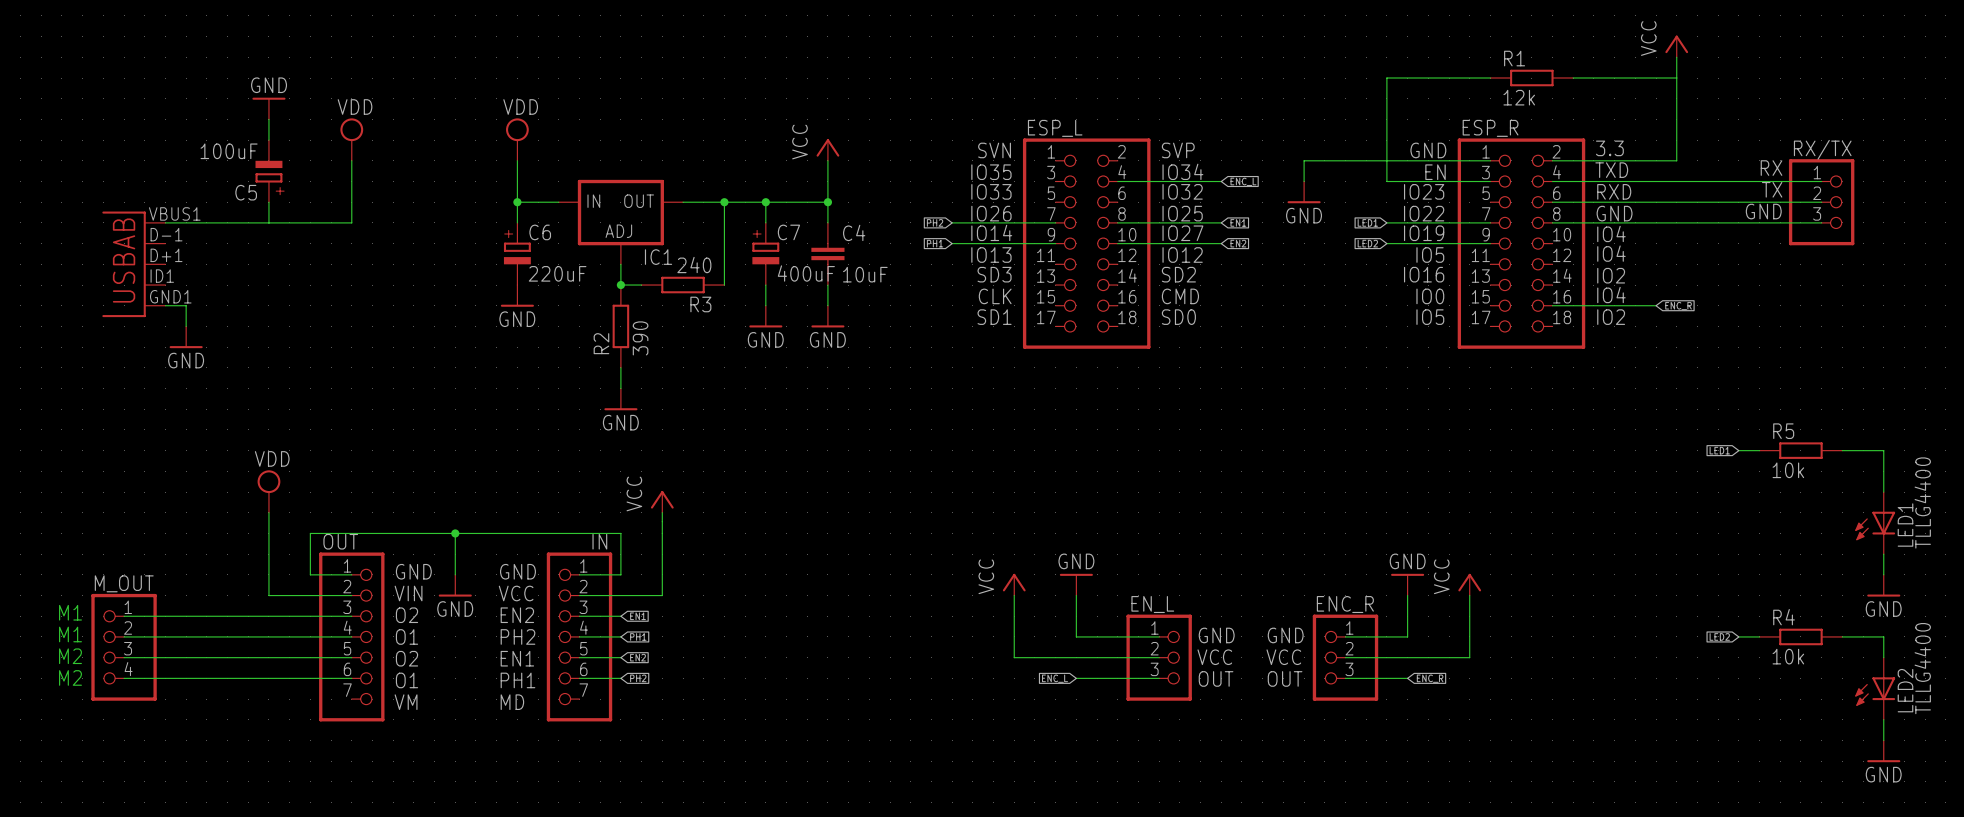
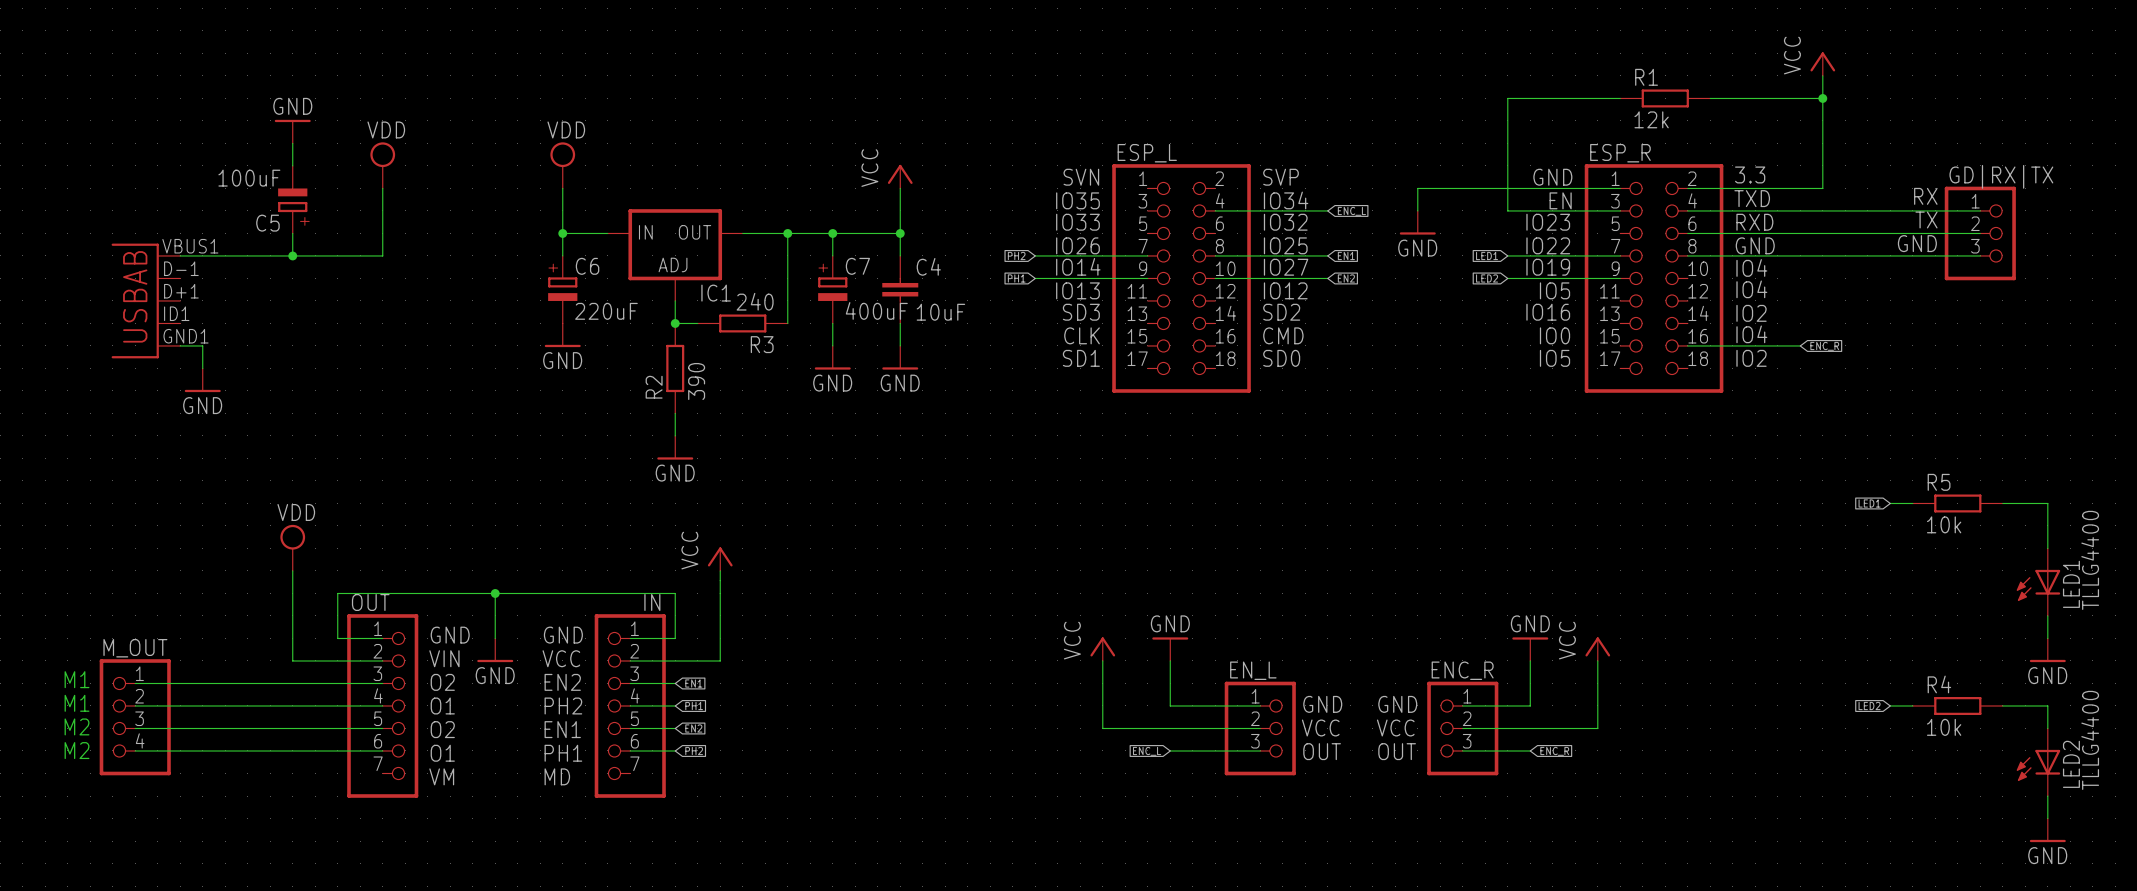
junction: none -> (1822, 98)
RX/TX name: RX/TX (1822, 149) -> GD|RX|TX (2001, 176)
junction: none -> (292, 255)

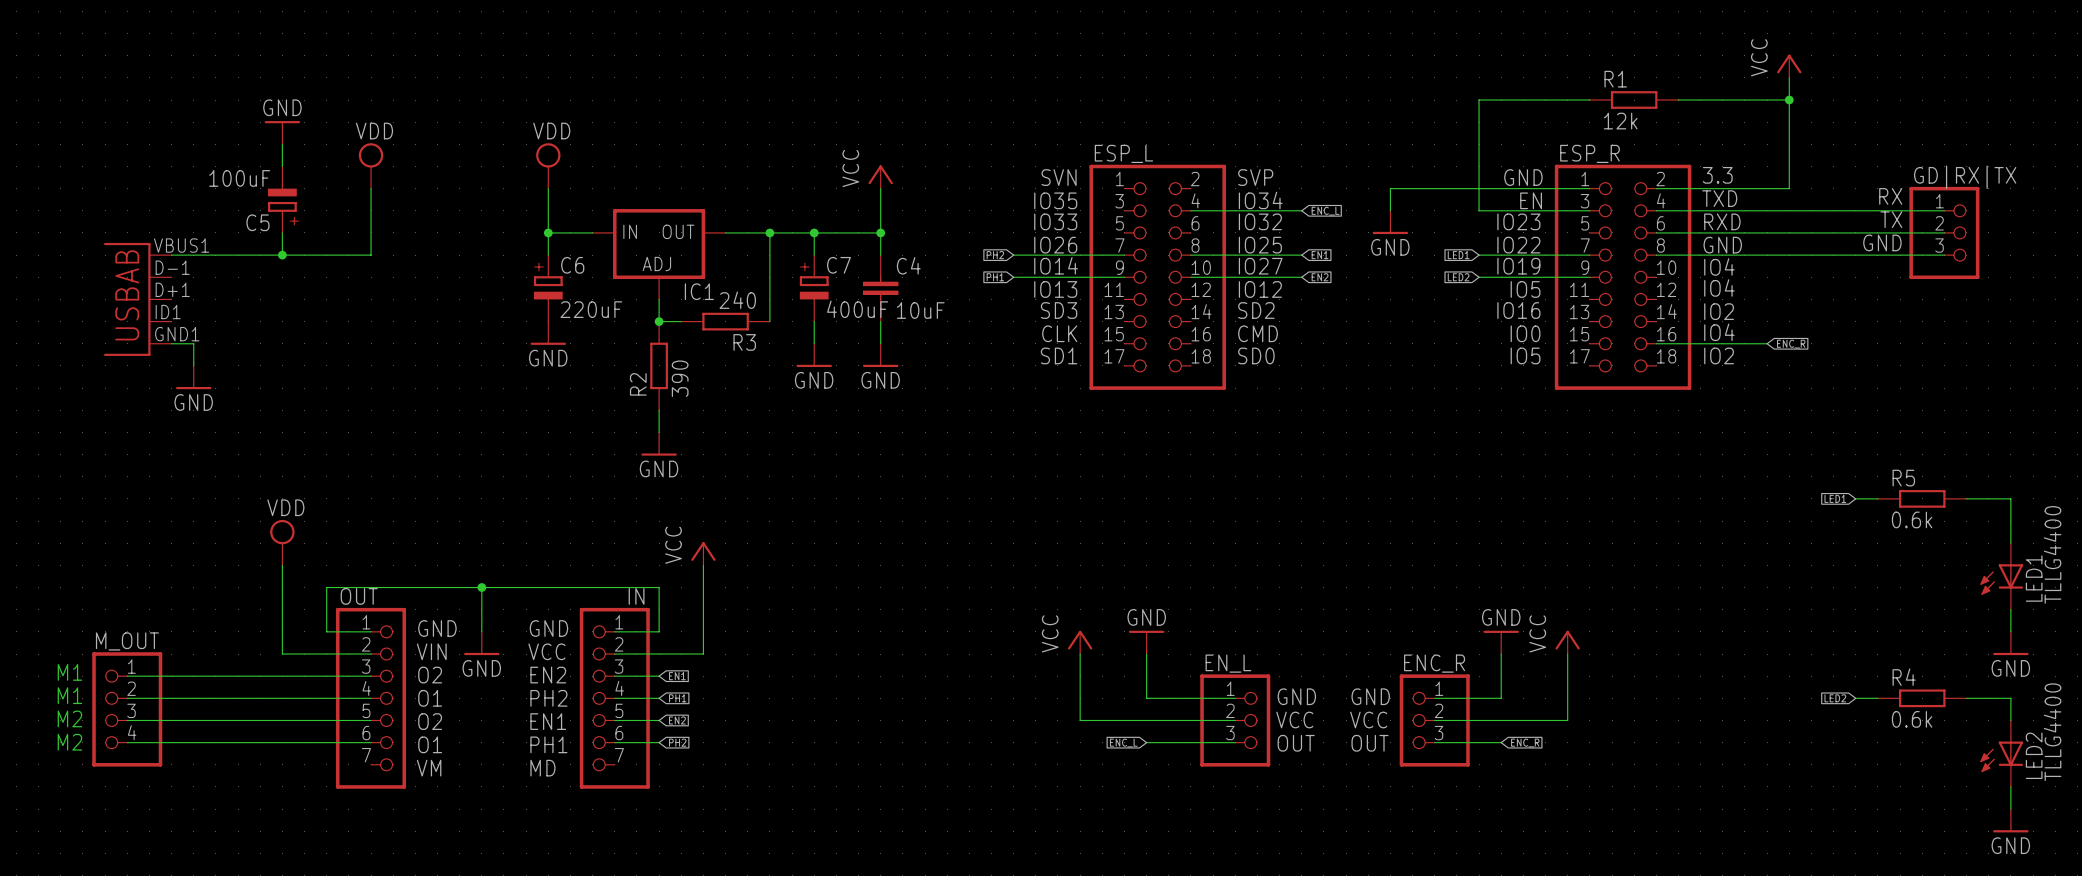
R5 value: 10k (1944, 524) -> 0.6k (1912, 519)
R4 value: 10k (1944, 727) -> 0.6k (1912, 719)

